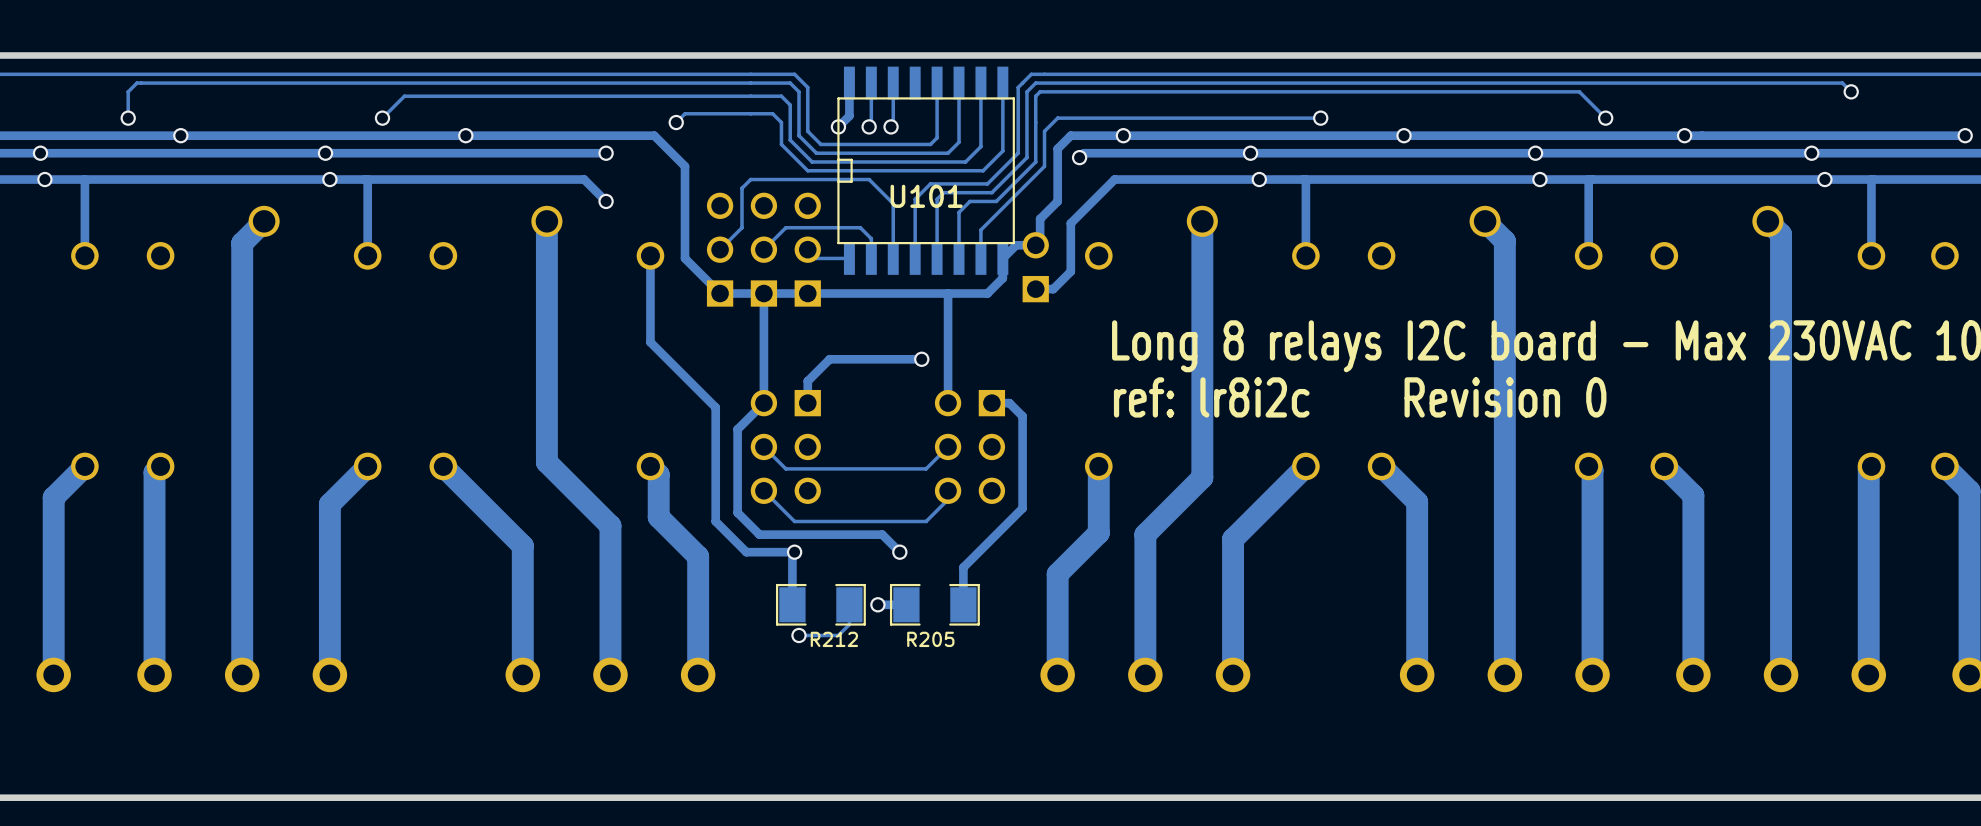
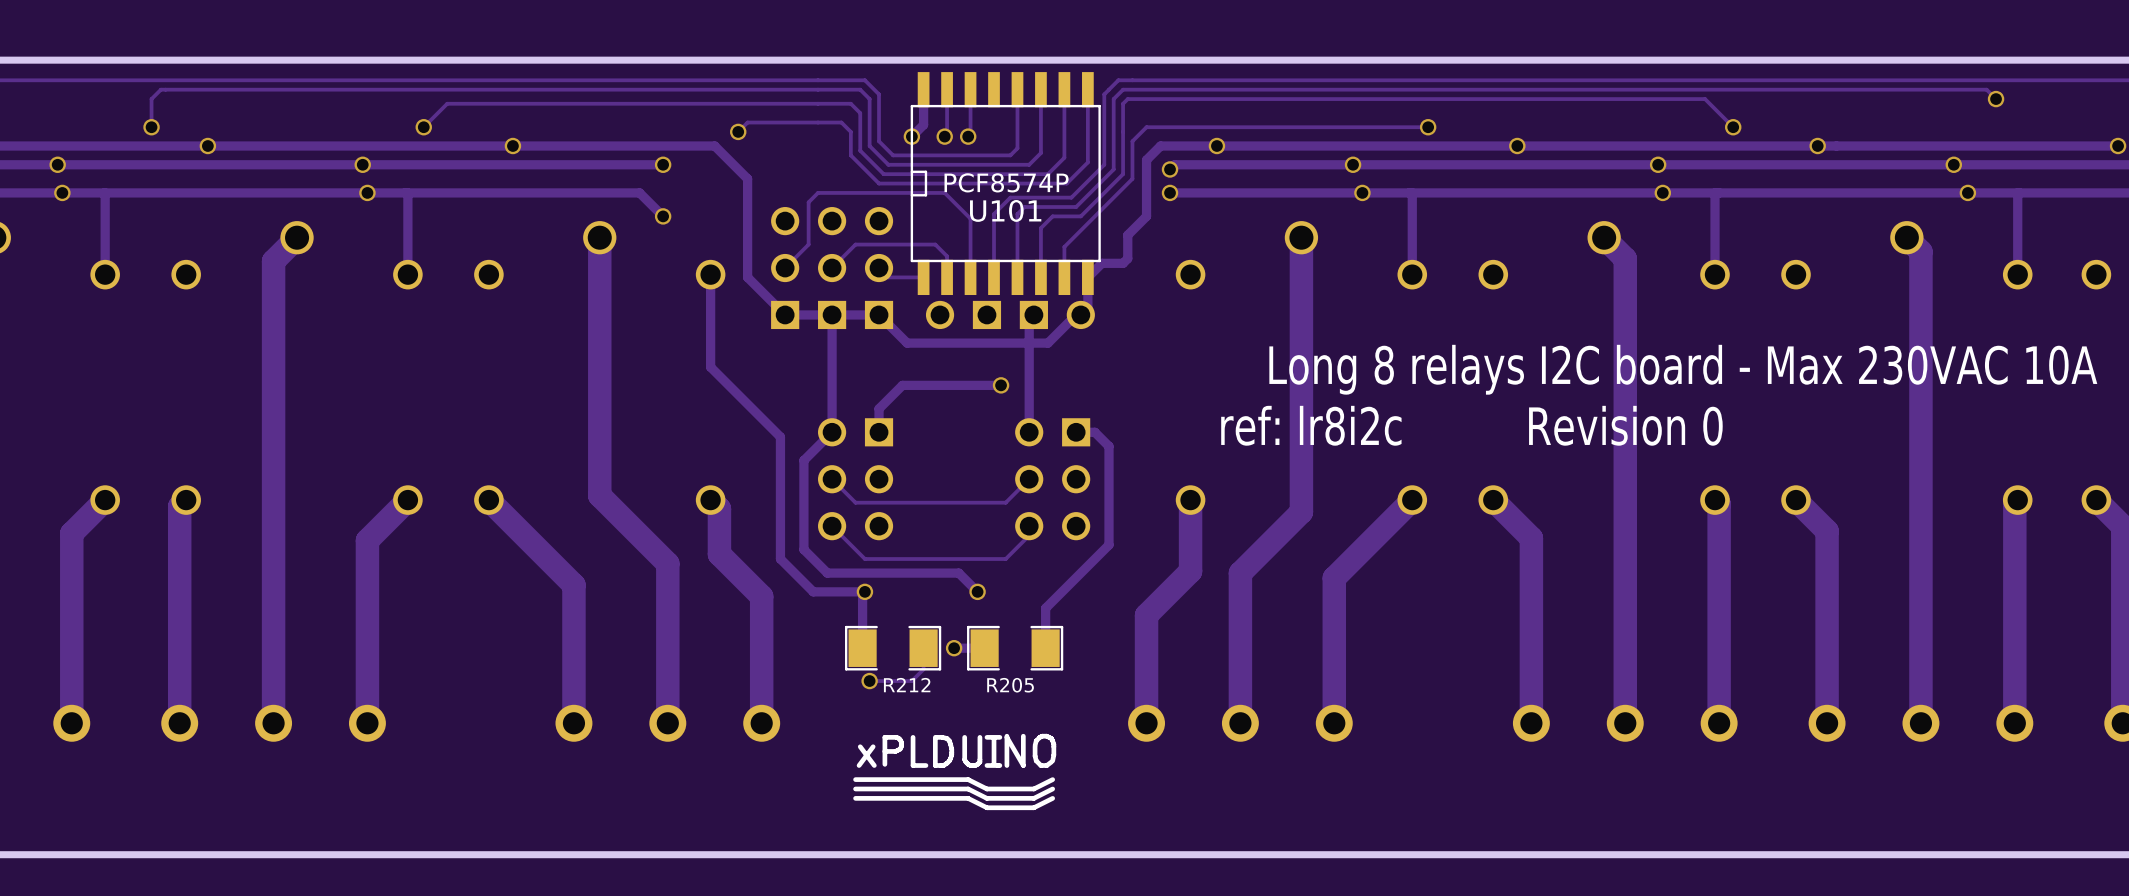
text: none -> PCF8574P (1006, 182)
via: none -> (1170, 192)
track: (1114, 179) (1070, 223) (1070, 271) (1053, 289) (1035, 289) -> (1207, 192) (1170, 192)
part rotation: 0° (1035, 267) -> 90° clockwise (1057, 314)
part position: (1035, 267) -> (1057, 314)
track: (1002, 278) (987, 293) (807, 293) -> (1087, 298) (1087, 307) (1080, 314) (1076, 314) (1047, 343) (907, 343) (879, 314)
part: none -> (963, 314)
drawing: none -> [853, 733, 1057, 811]

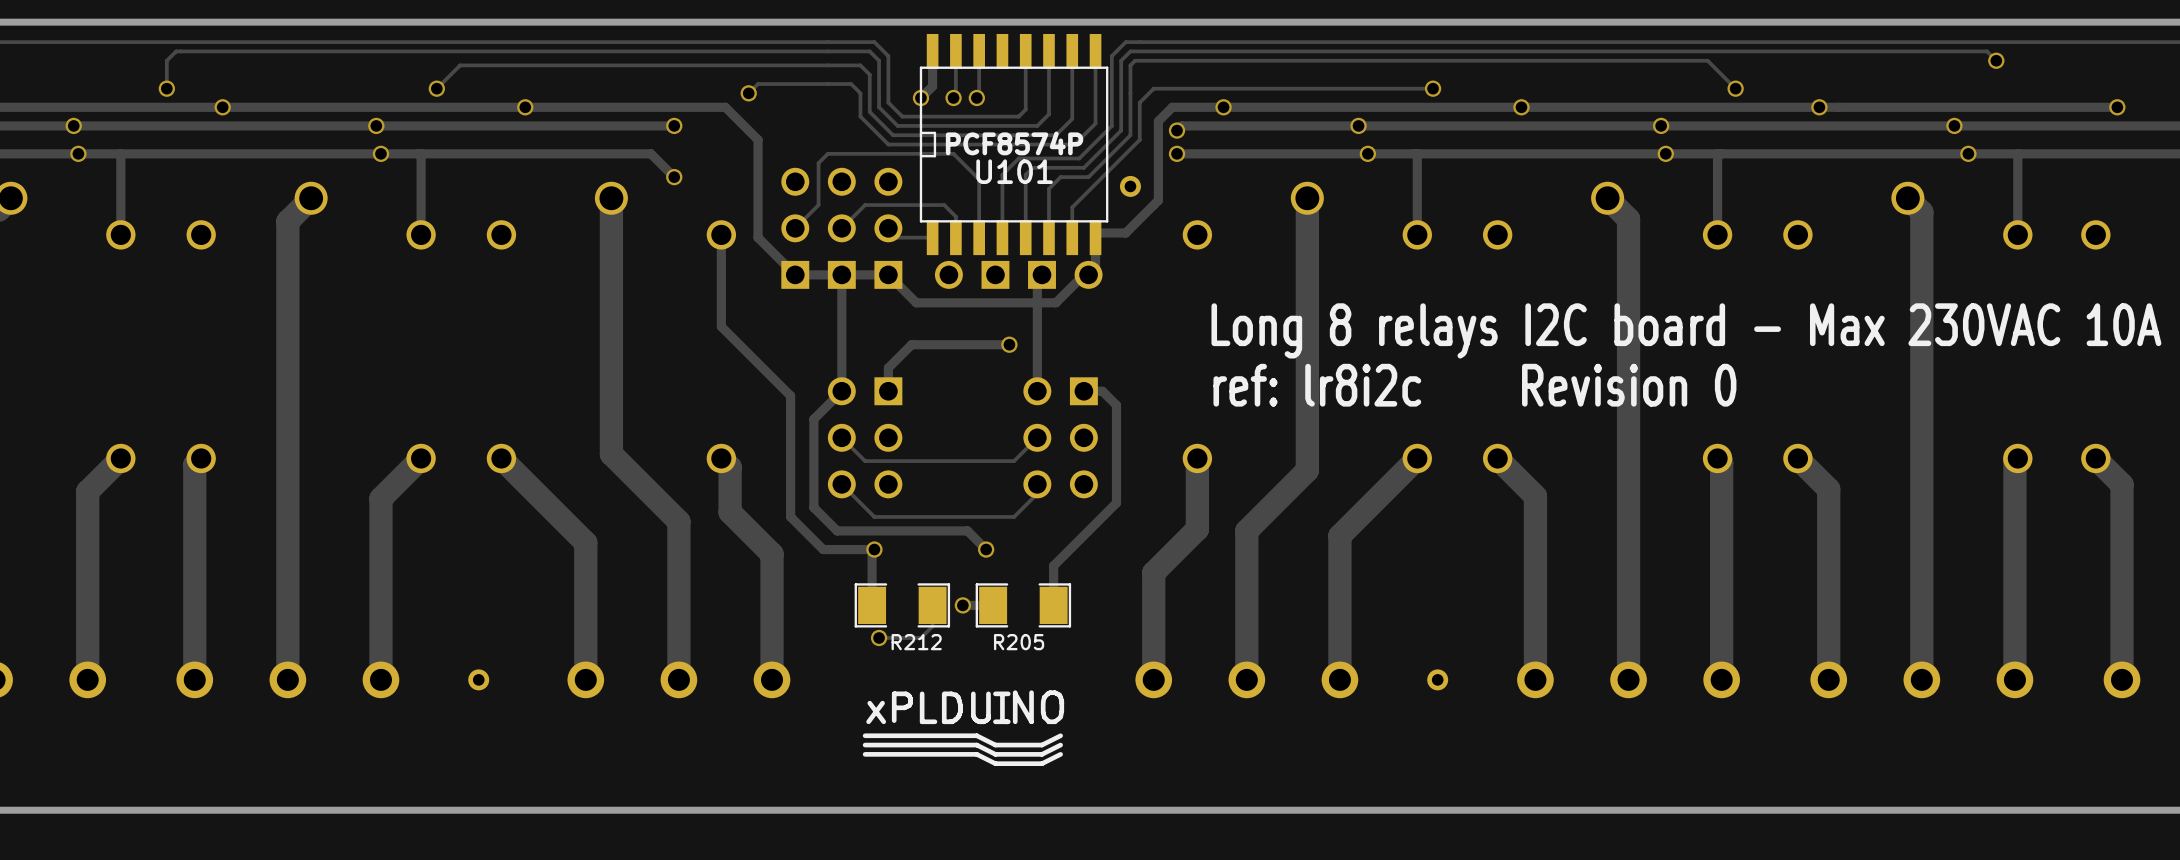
track: (1165, 146) (1160, 146) (1146, 160) (1146, 216) (1127, 235) (1127, 258) (1123, 263) (1101, 263) (1087, 277) -> (1172, 107) (1158, 121) (1158, 200) (1125, 232) (1095, 232) (1095, 237)
part: none -> (1130, 186)
part: none -> (478, 679)
part: none -> (1437, 679)

